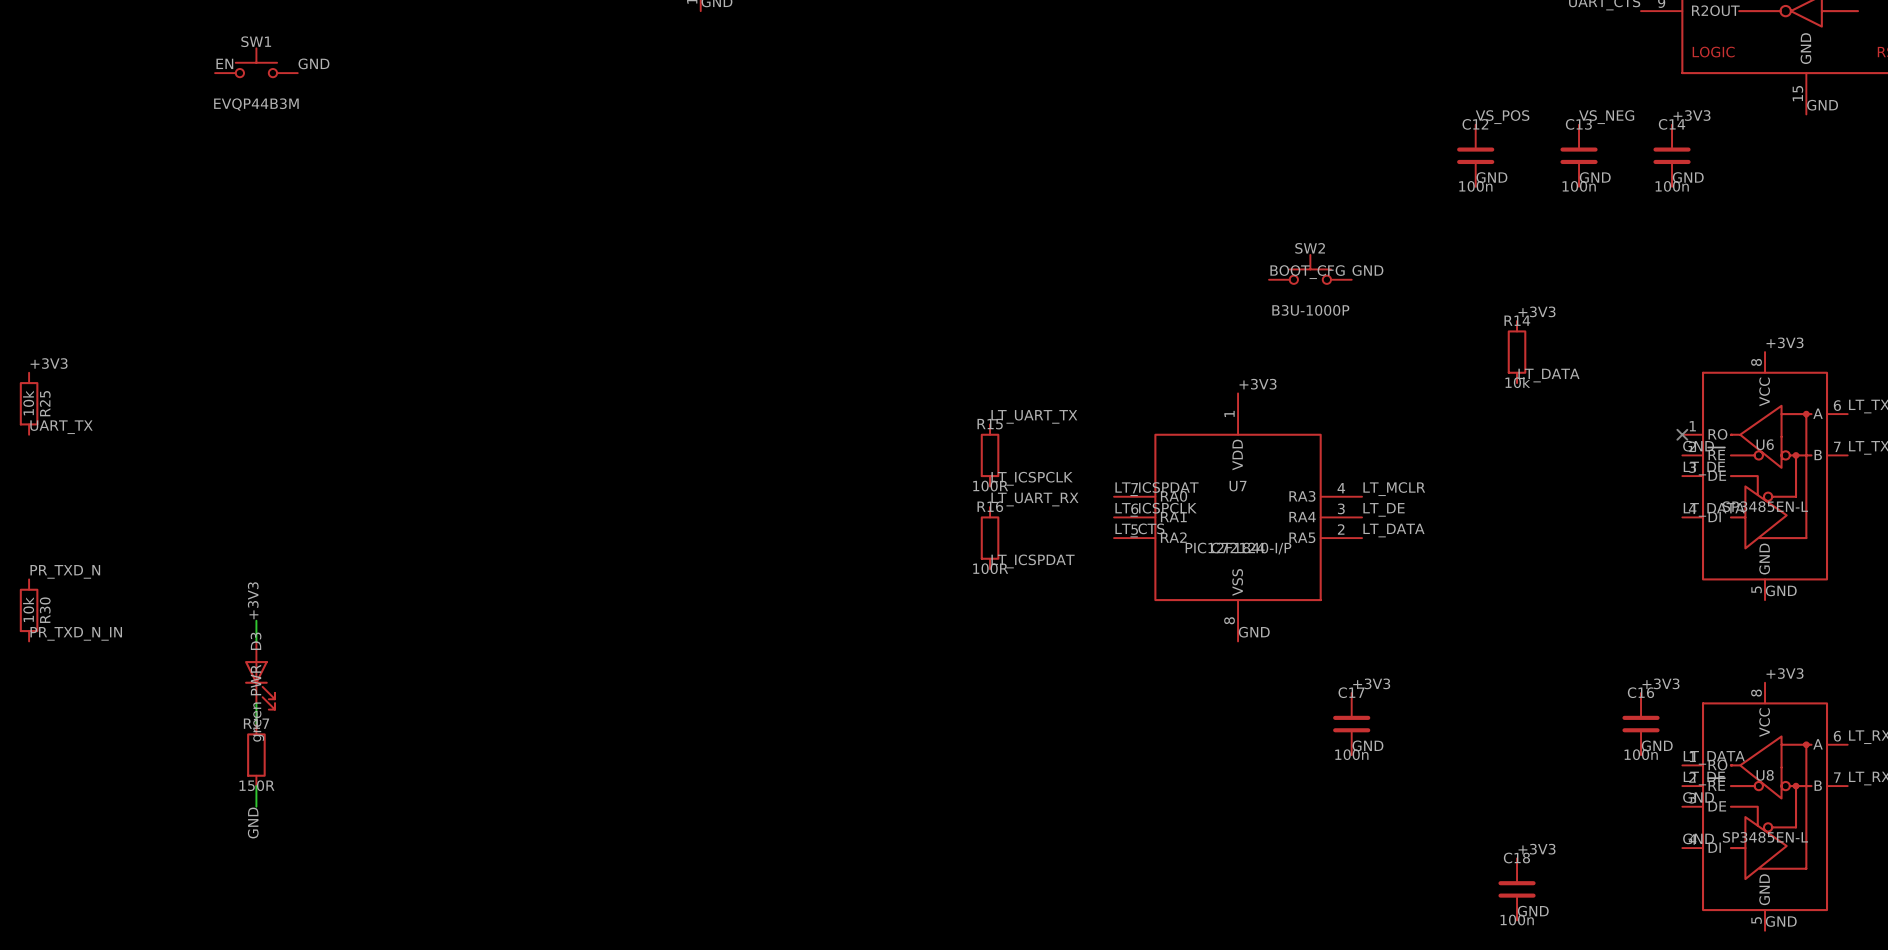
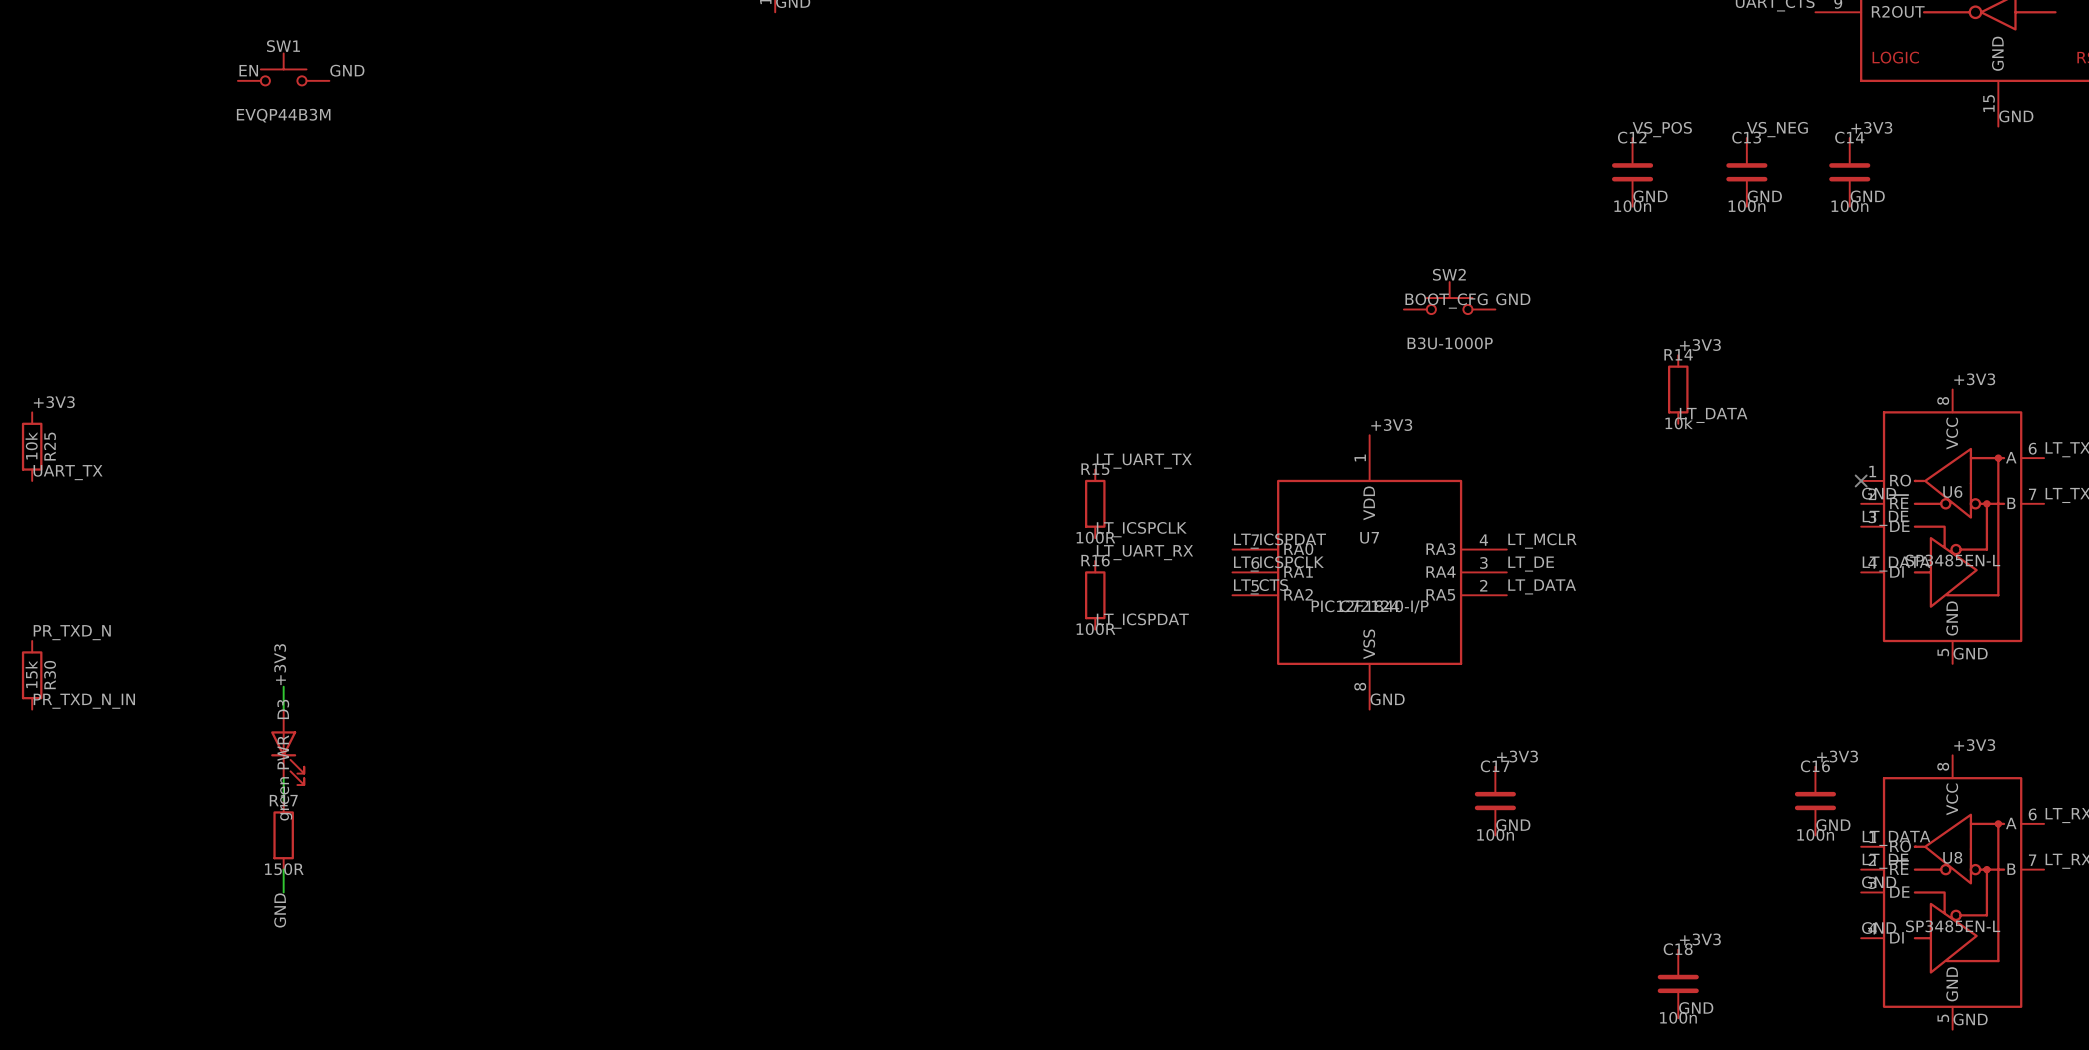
R30 value: 10k (28, 609) -> 15k (31, 674)

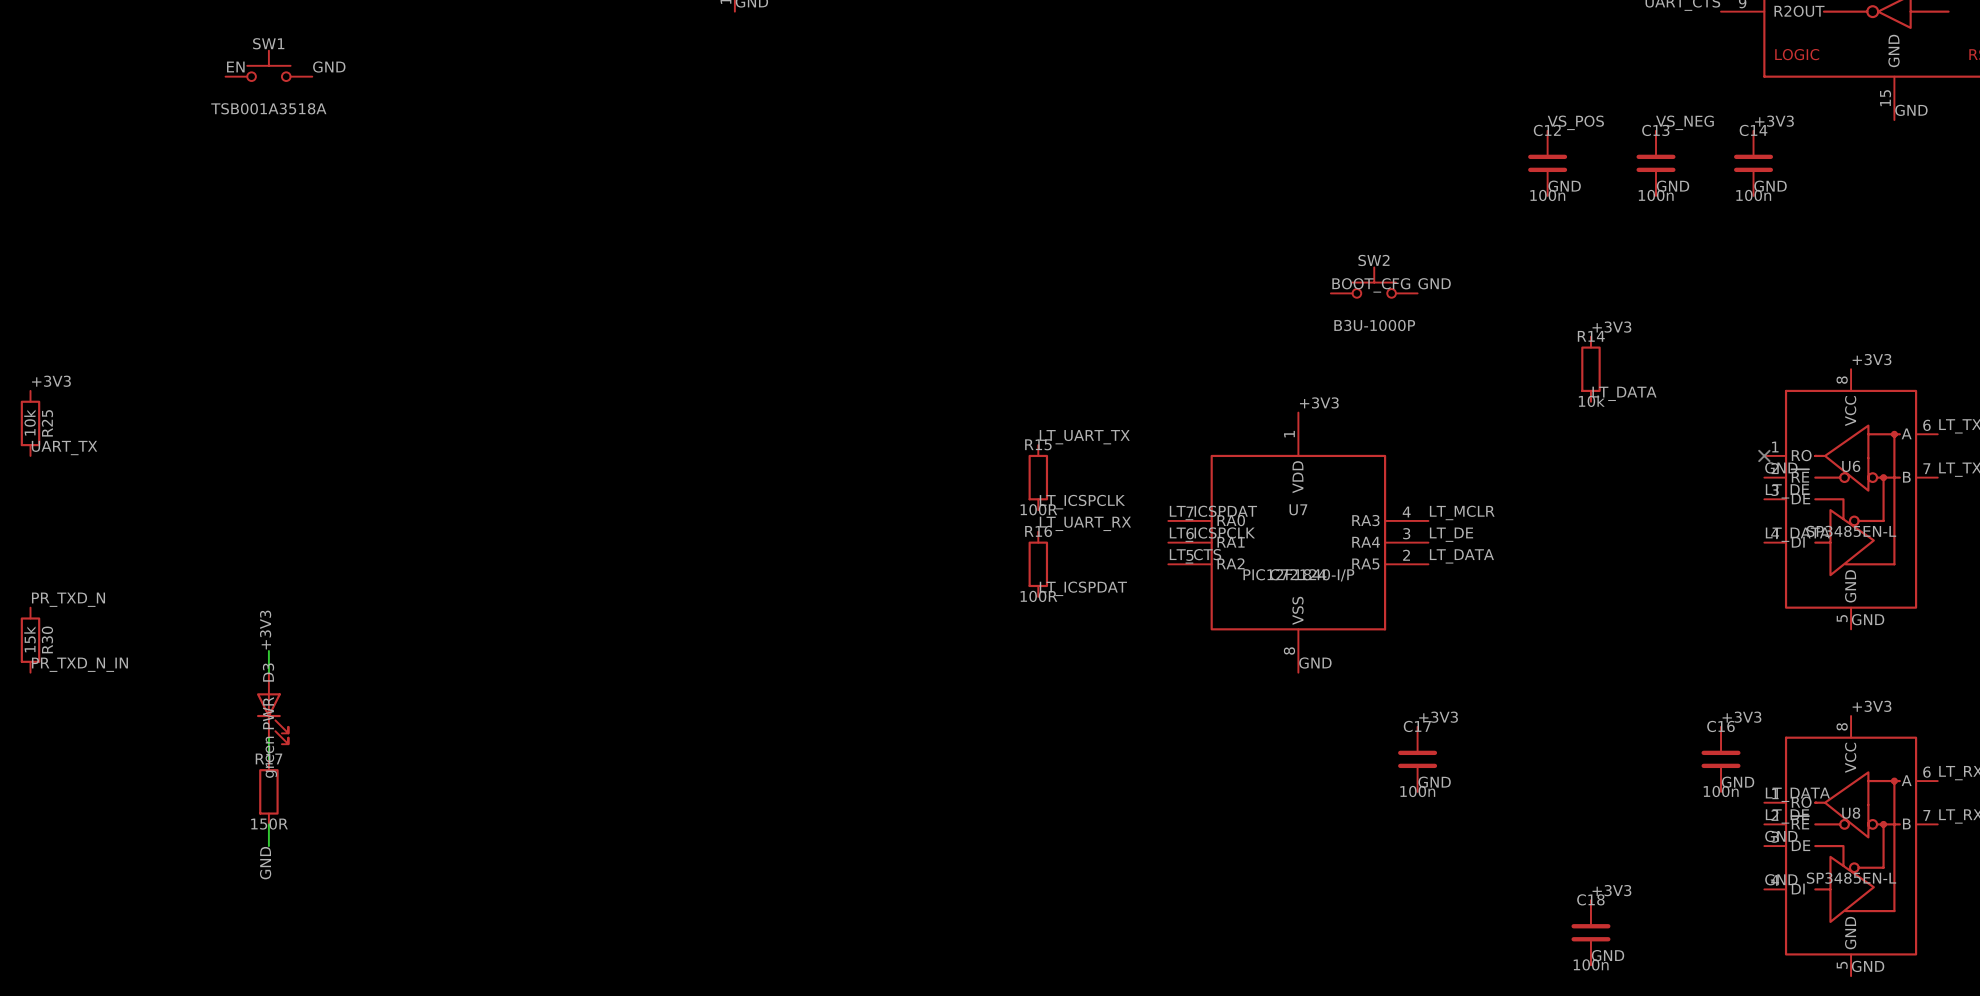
SW1 value: EVQP44B3M (283, 115) -> TSB001A3518A (268, 108)

